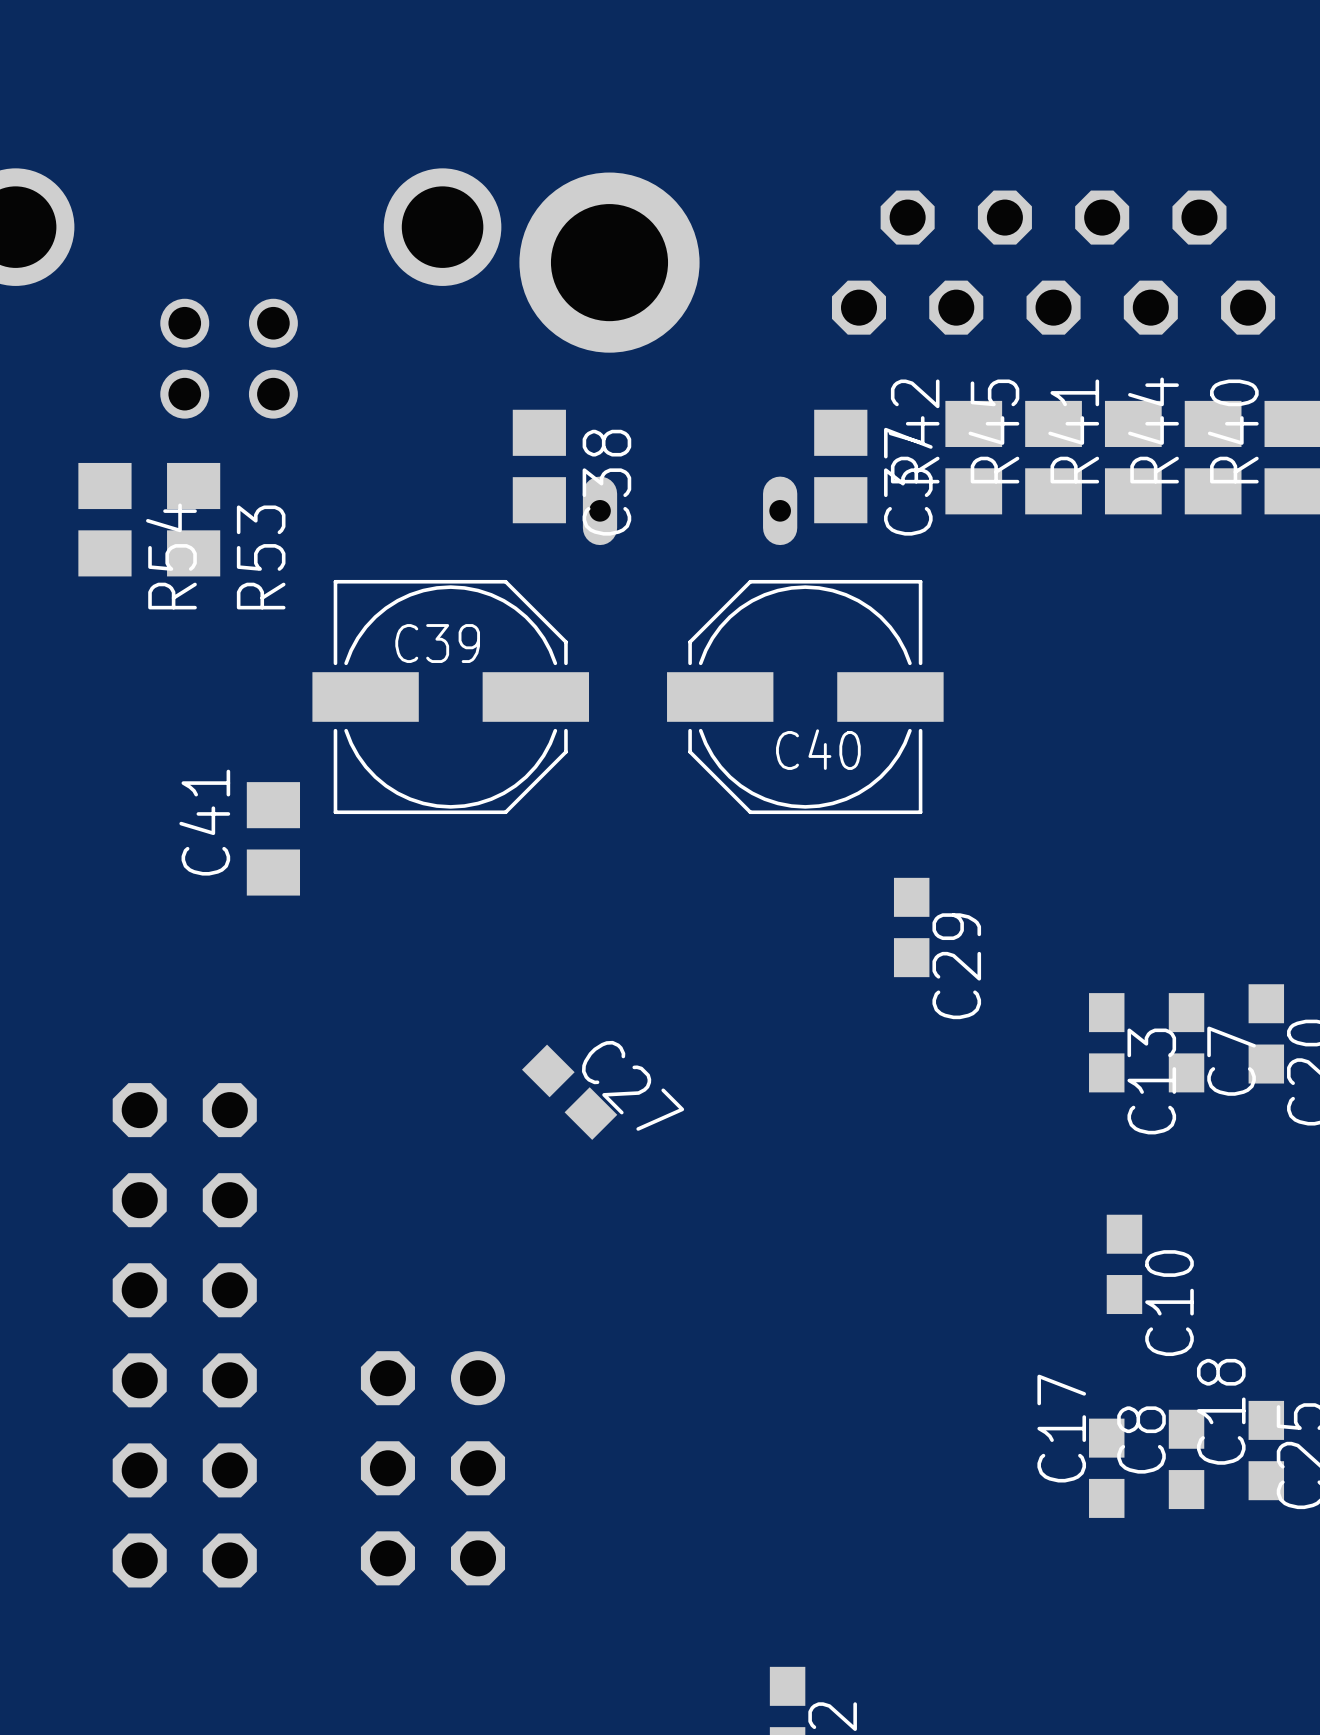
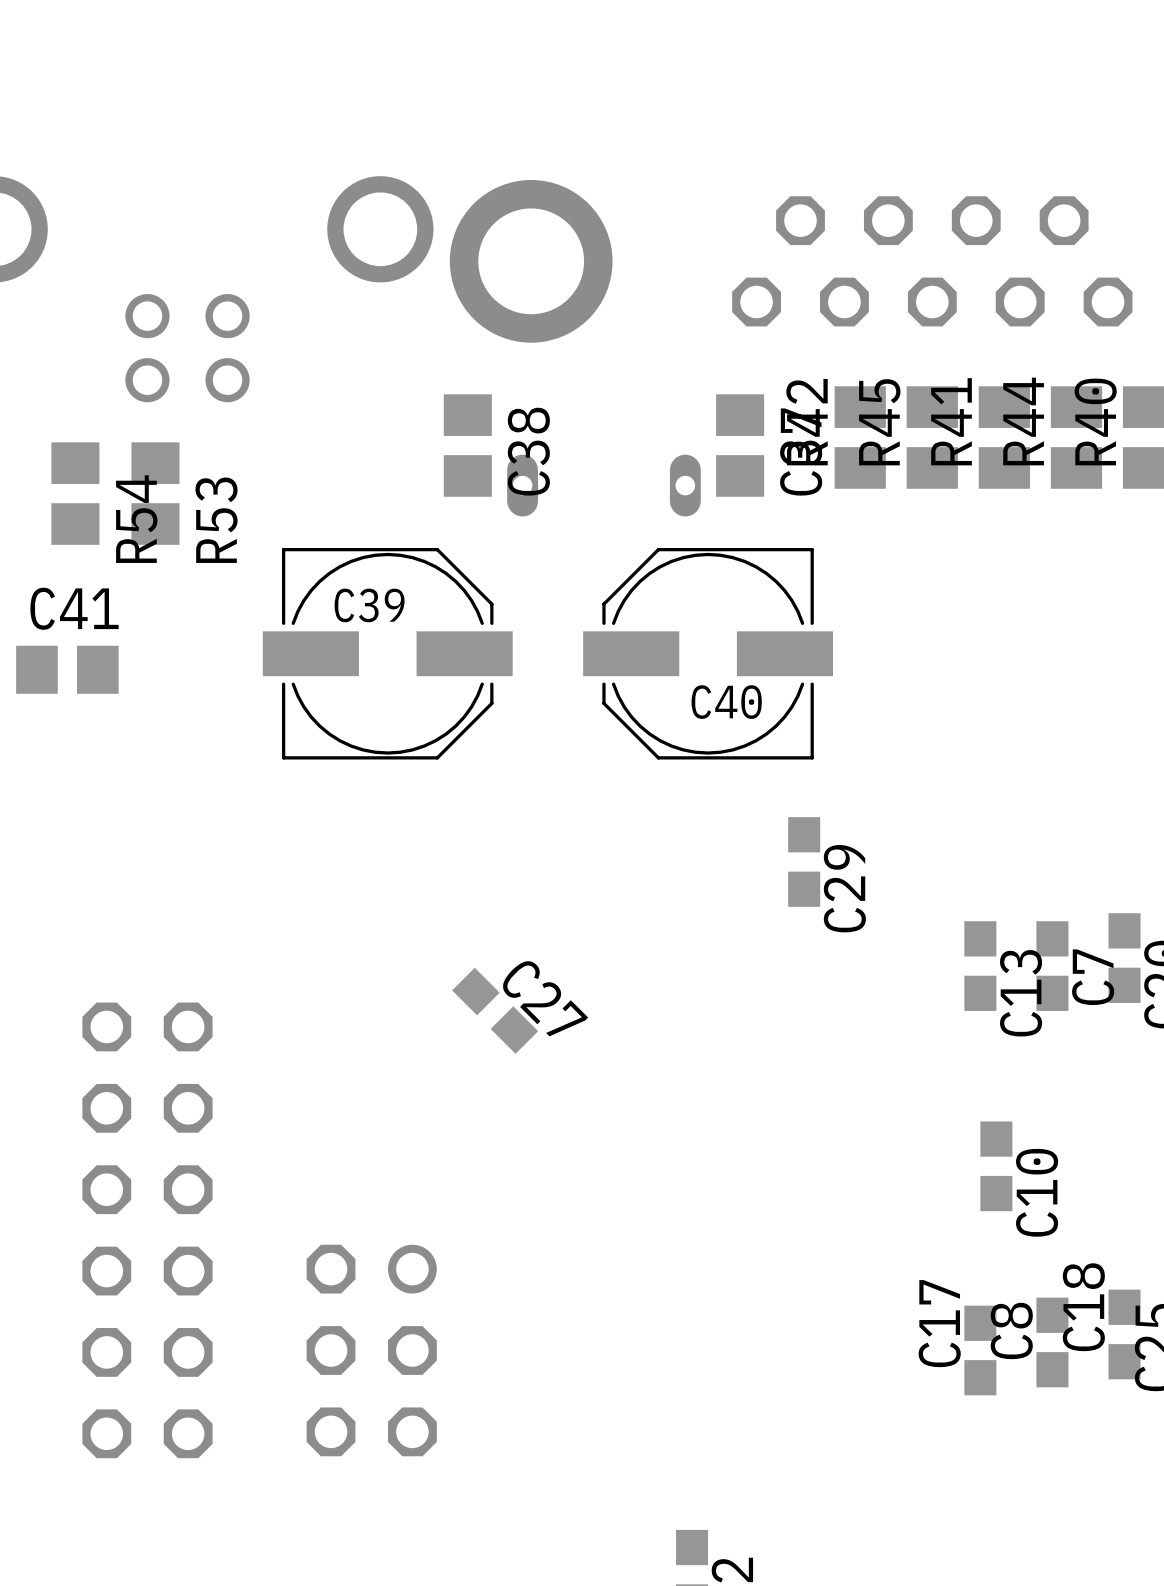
C41 rotation: 0° (273, 838) -> 90° clockwise (67, 669)
C41 position: (273, 838) -> (67, 669)

